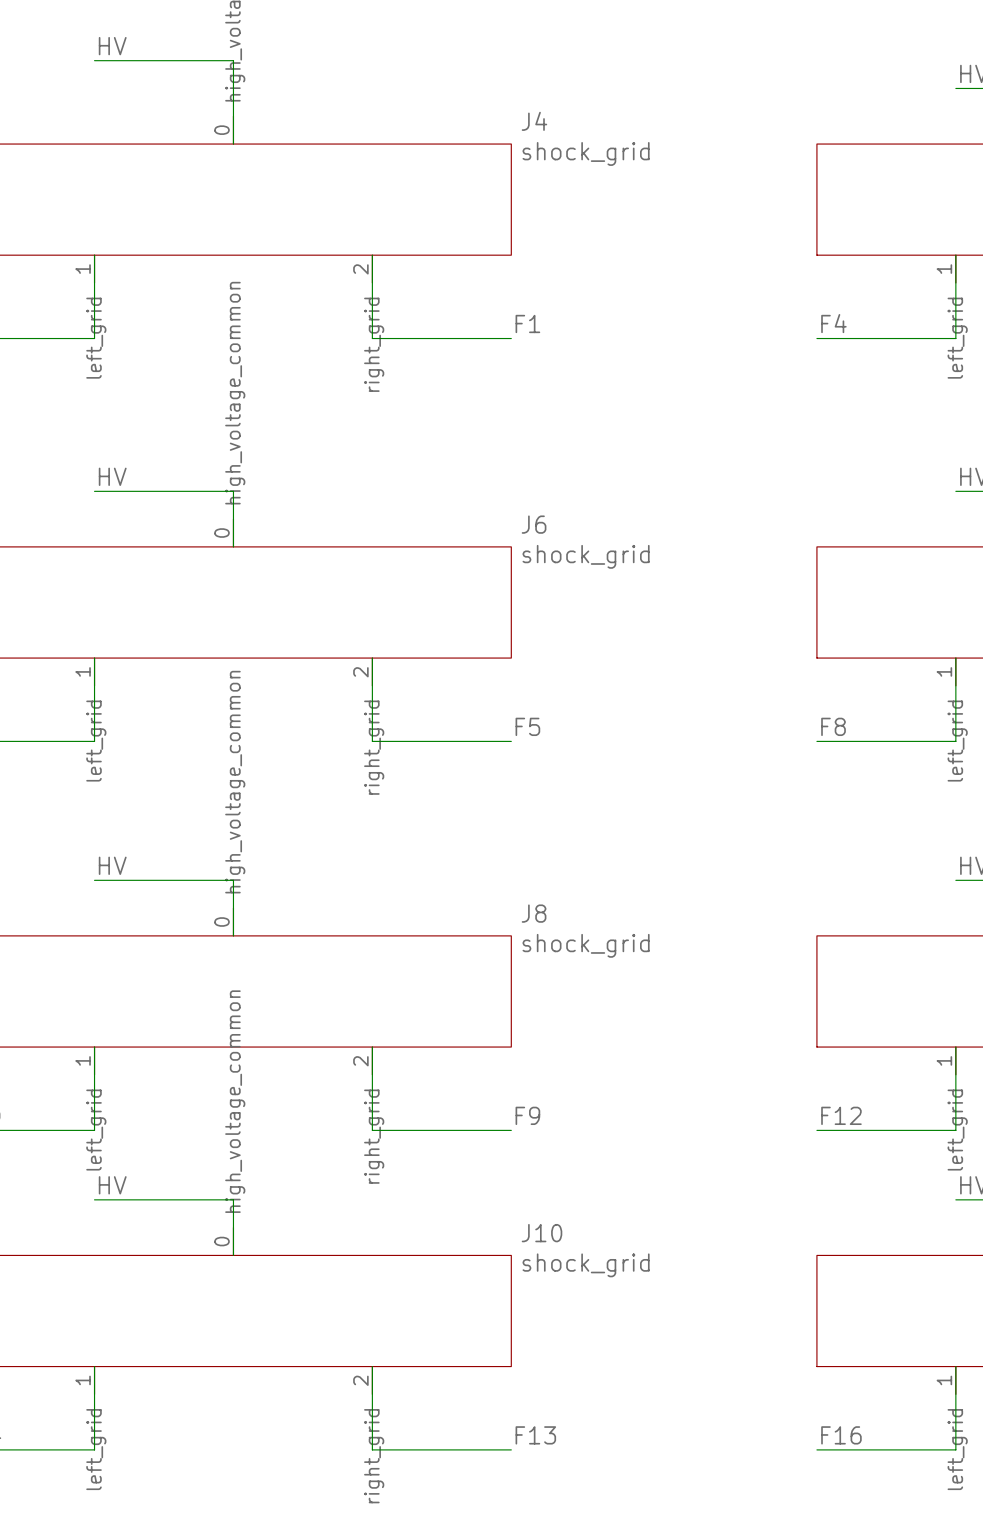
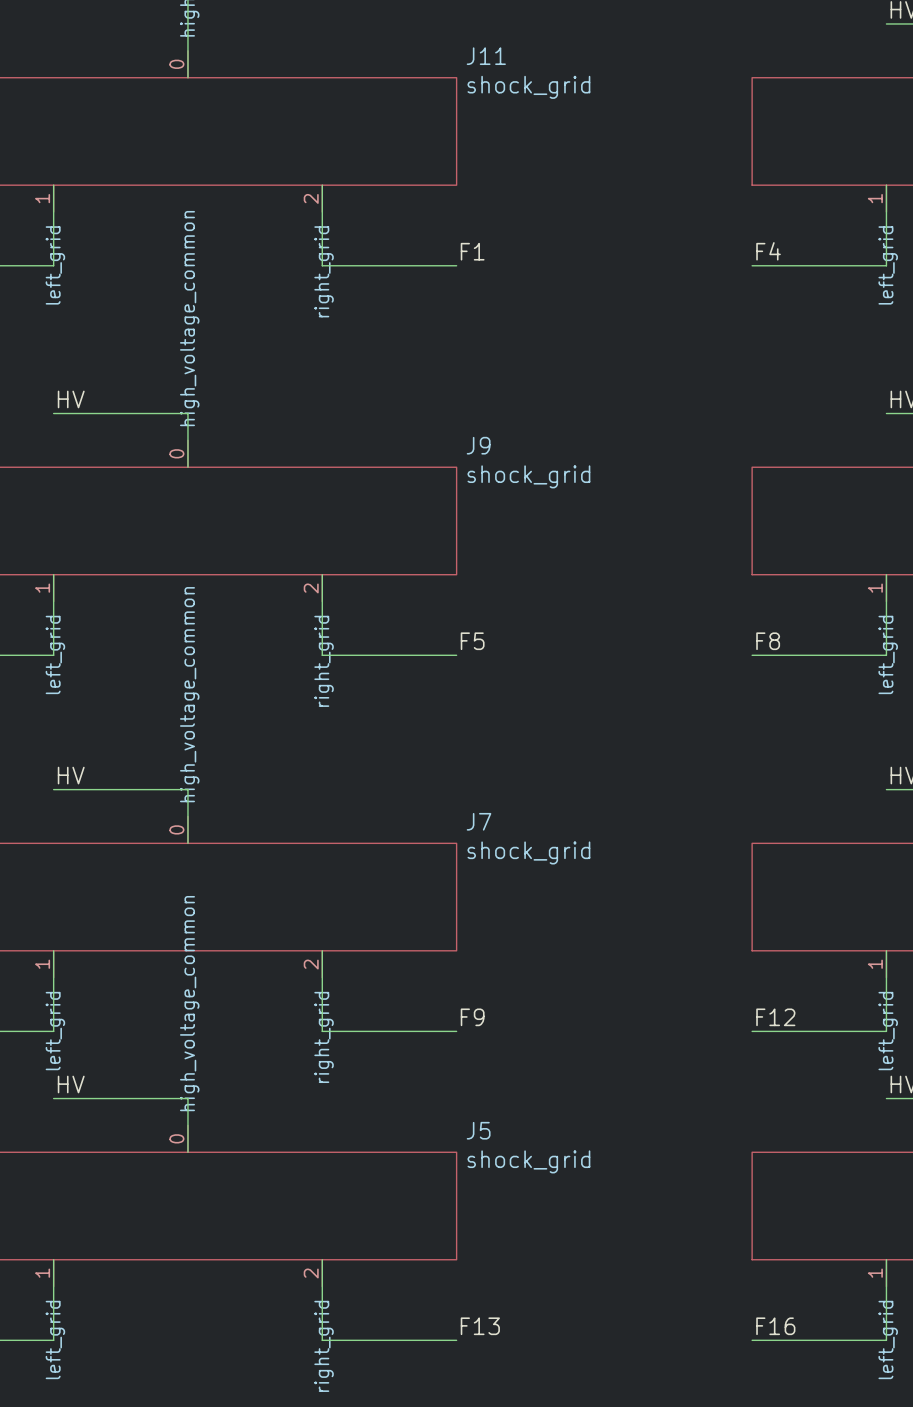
J4 name: J4 (534, 121) -> J11 (486, 56)
J6 name: J6 (534, 524) -> J9 (478, 445)
J8 name: J8 (534, 913) -> J7 (479, 821)
J10 name: J10 (542, 1233) -> J5 (478, 1130)

